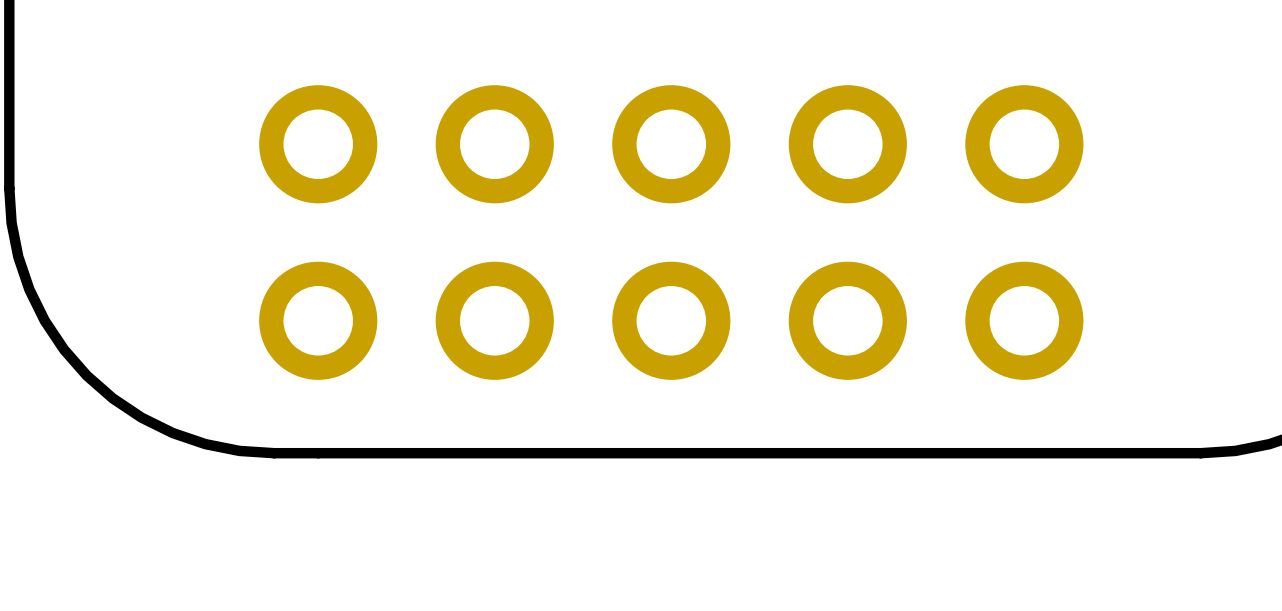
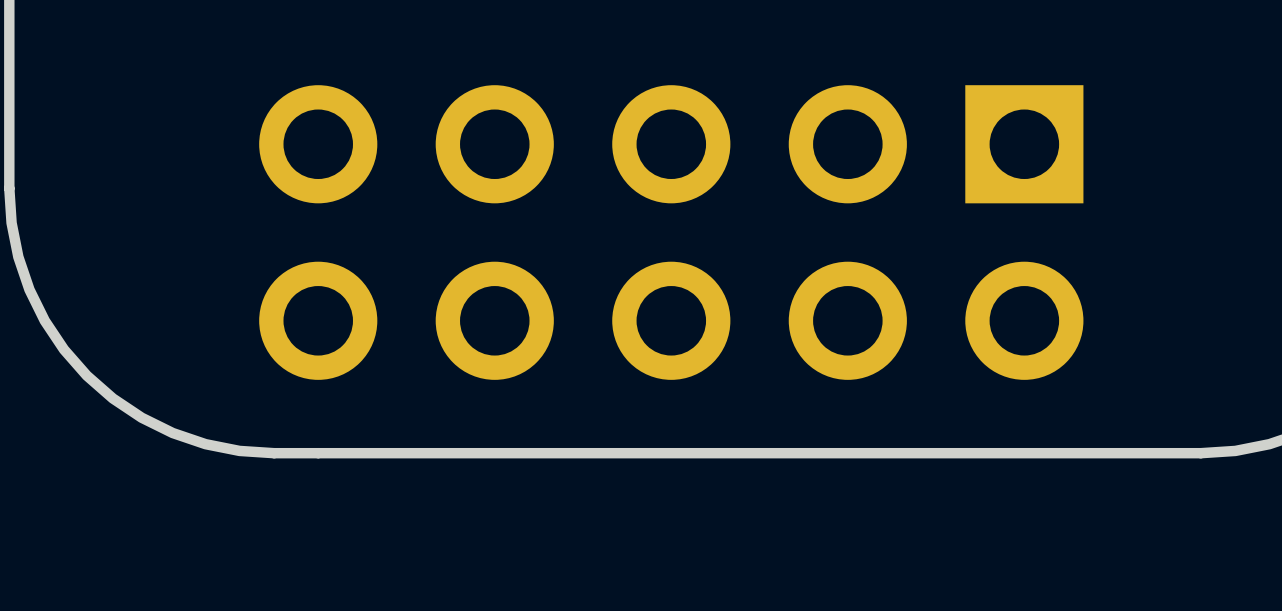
part footprint: [259, 85, 1084, 380] -> [259, 85, 1084, 380]

